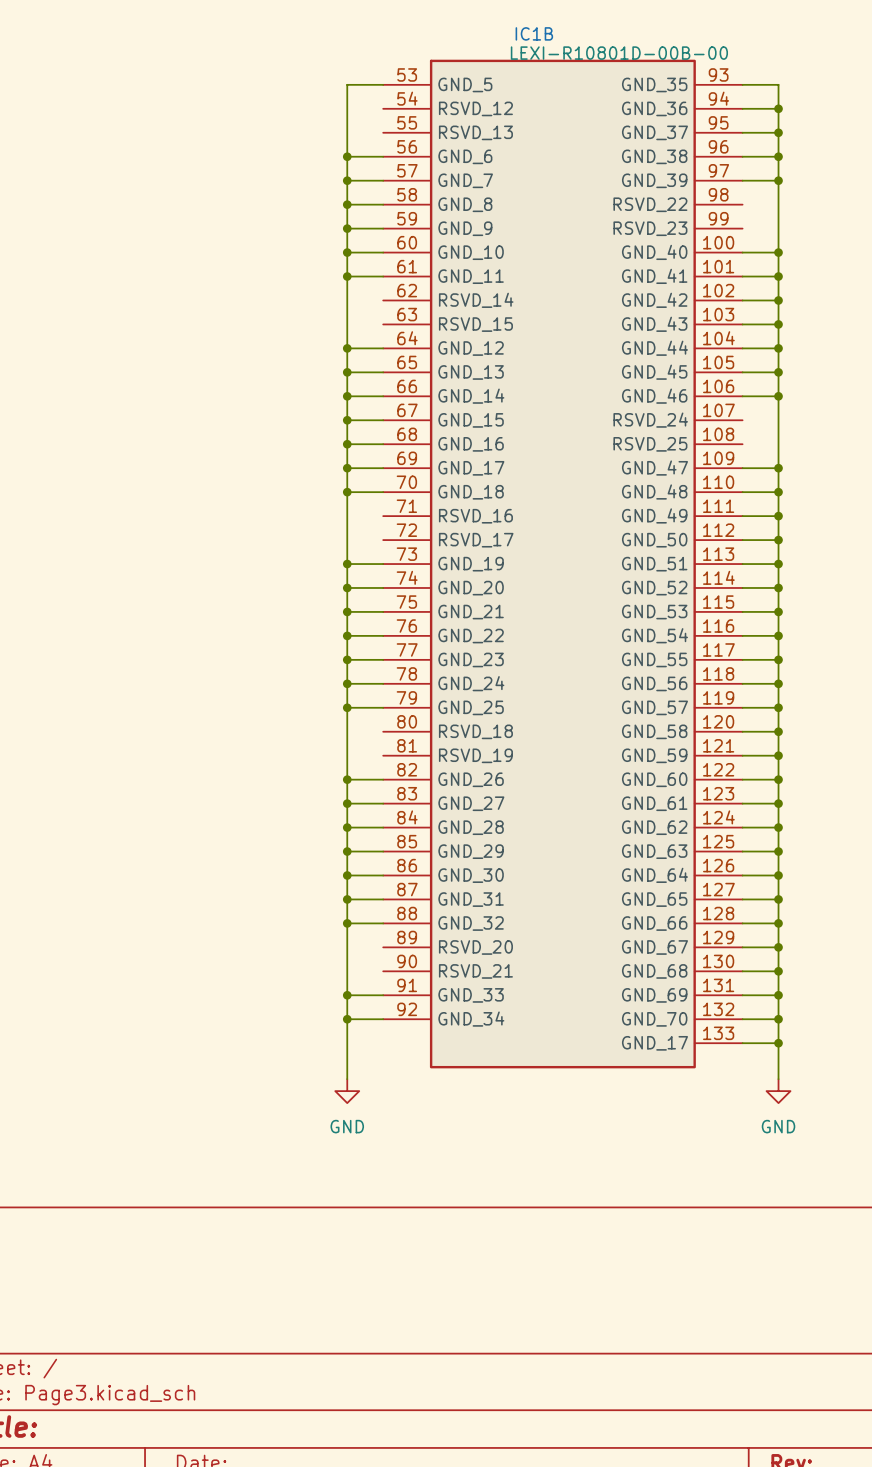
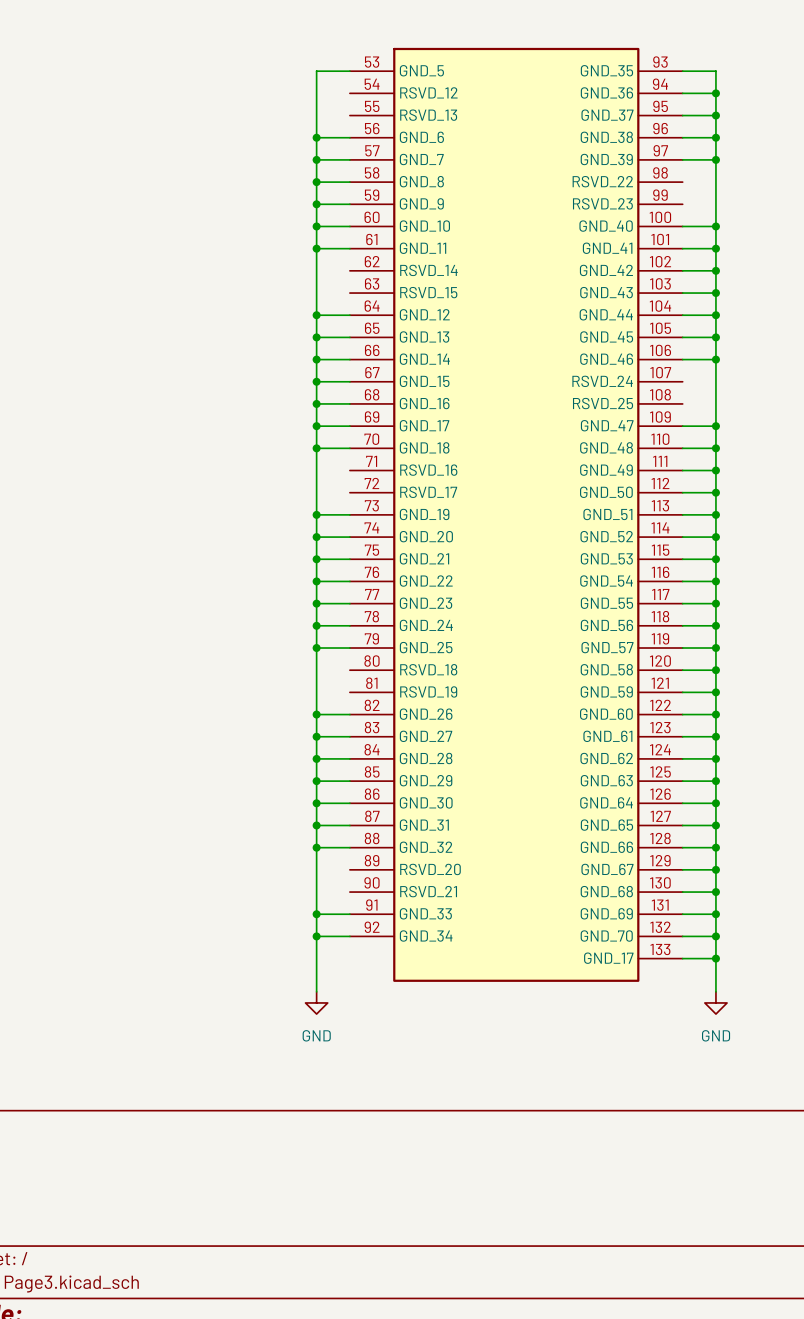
IC1B name: IC1B (534, 33) -> none
IC1B value: LEXI-R10801D-00B-00 (619, 53) -> none

